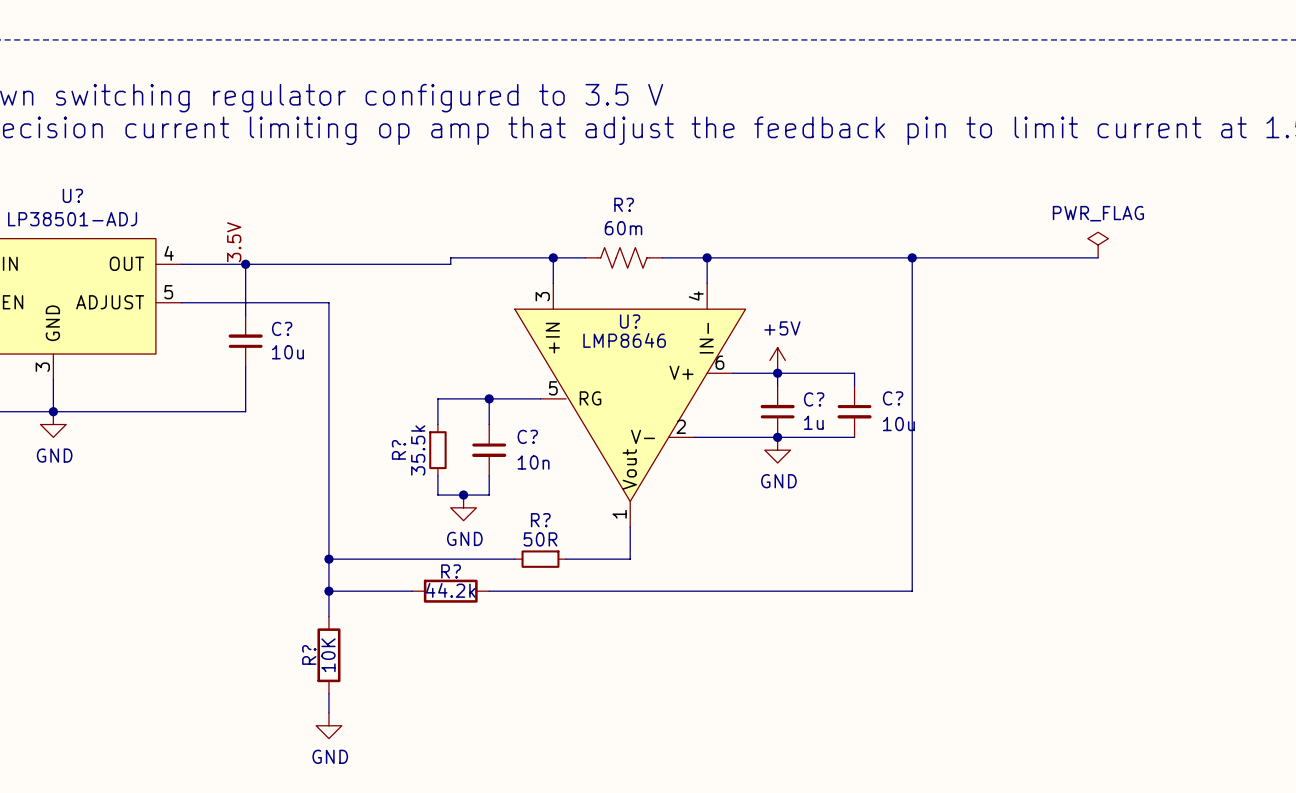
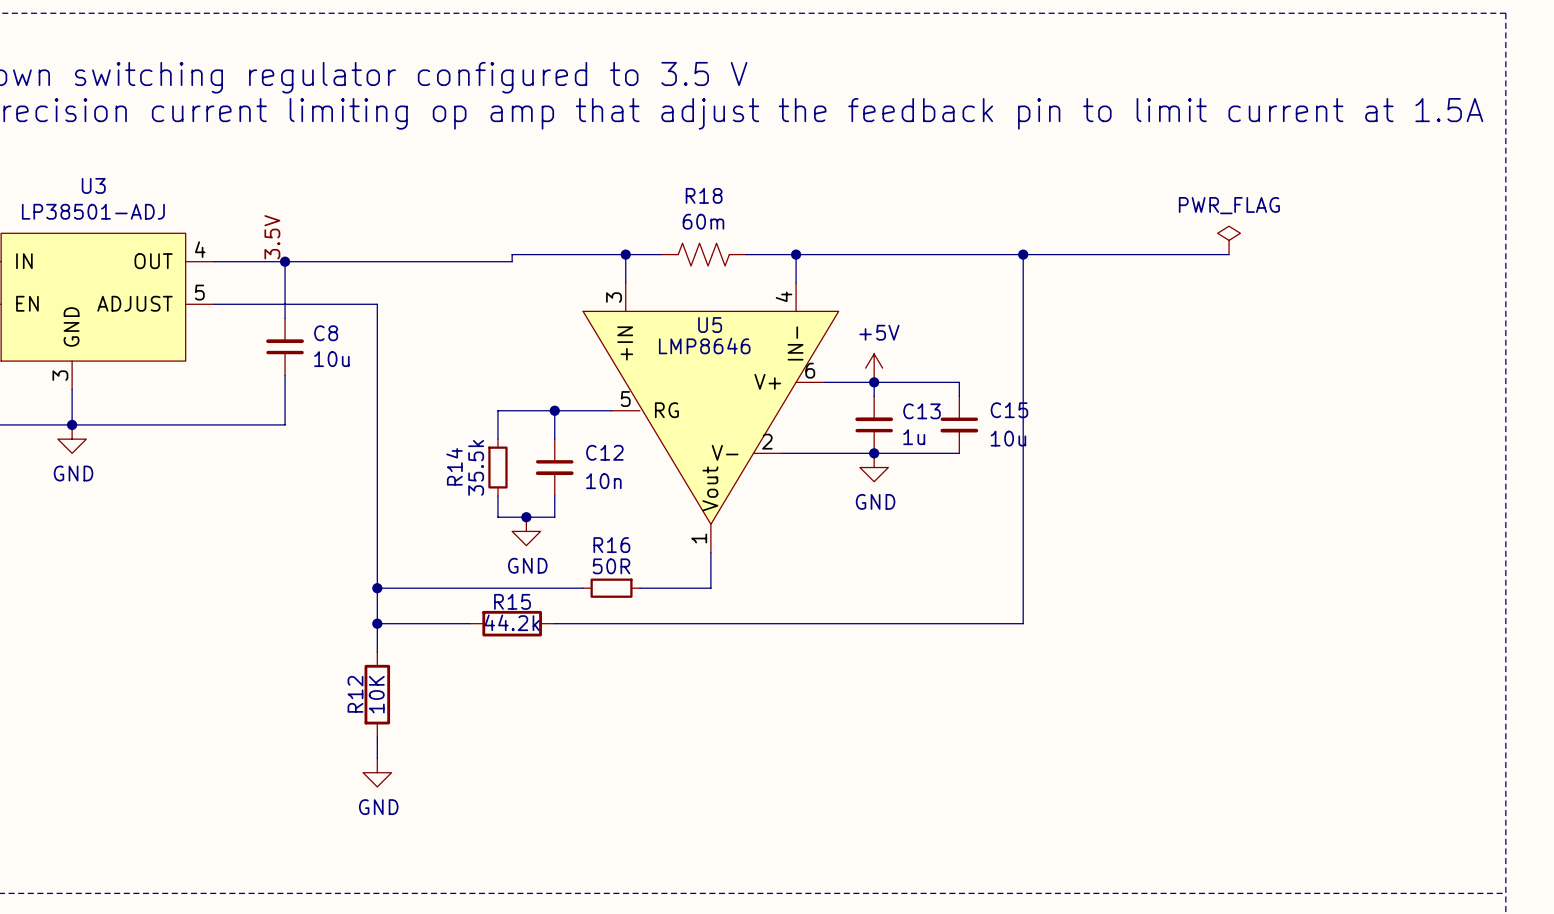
U? name: U? (72, 195) -> U3 (93, 185)
R? name: R? (624, 204) -> R18 (704, 195)
U? name: U? (630, 321) -> U5 (710, 325)
C? name: C? (282, 328) -> C8 (326, 333)
C? name: C? (893, 398) -> C15 (1009, 410)
C? name: C? (814, 399) -> C13 (922, 411)
C? name: C? (527, 436) -> C12 (604, 452)
R? name: R? (399, 449) -> R14 (454, 466)
R? name: R? (540, 520) -> R16 (611, 545)
R? name: R? (451, 571) -> R15 (512, 601)
R? name: R? (309, 654) -> R12 (355, 694)

